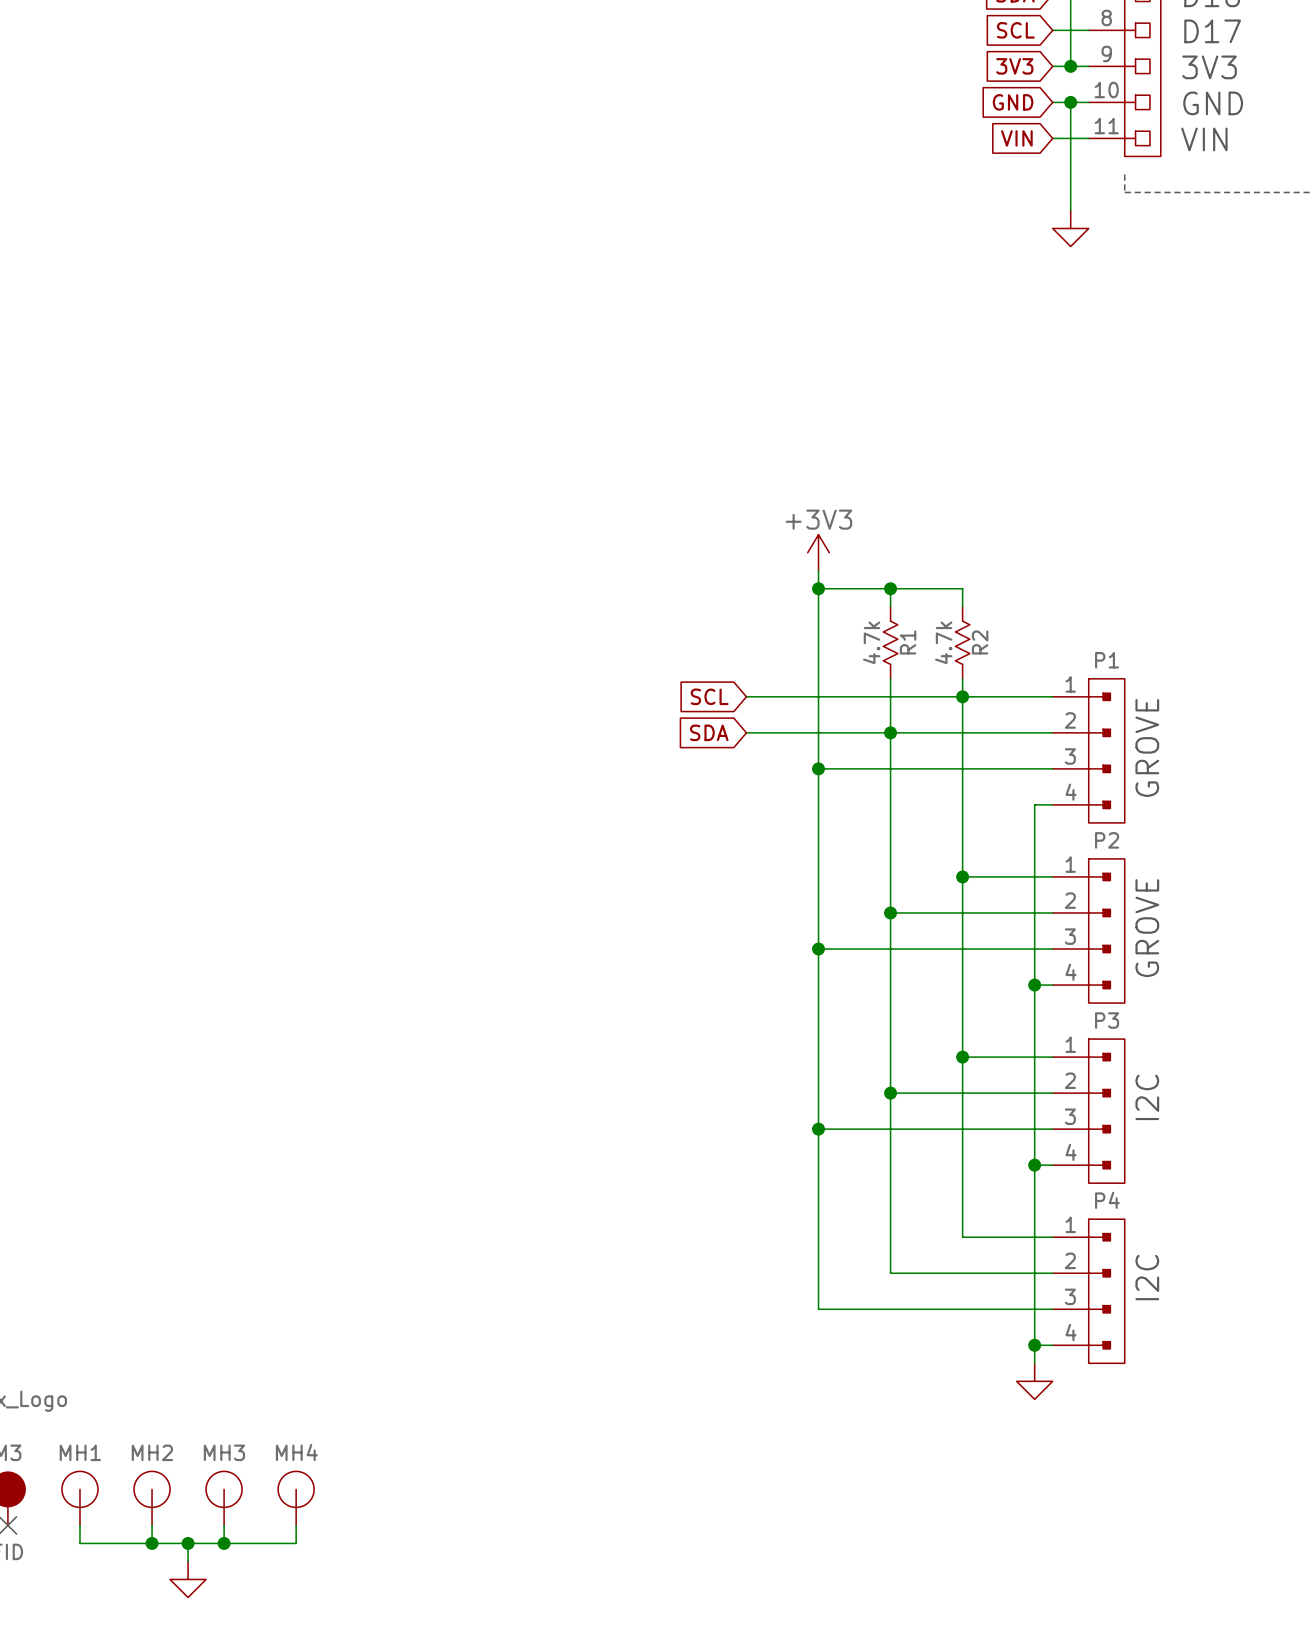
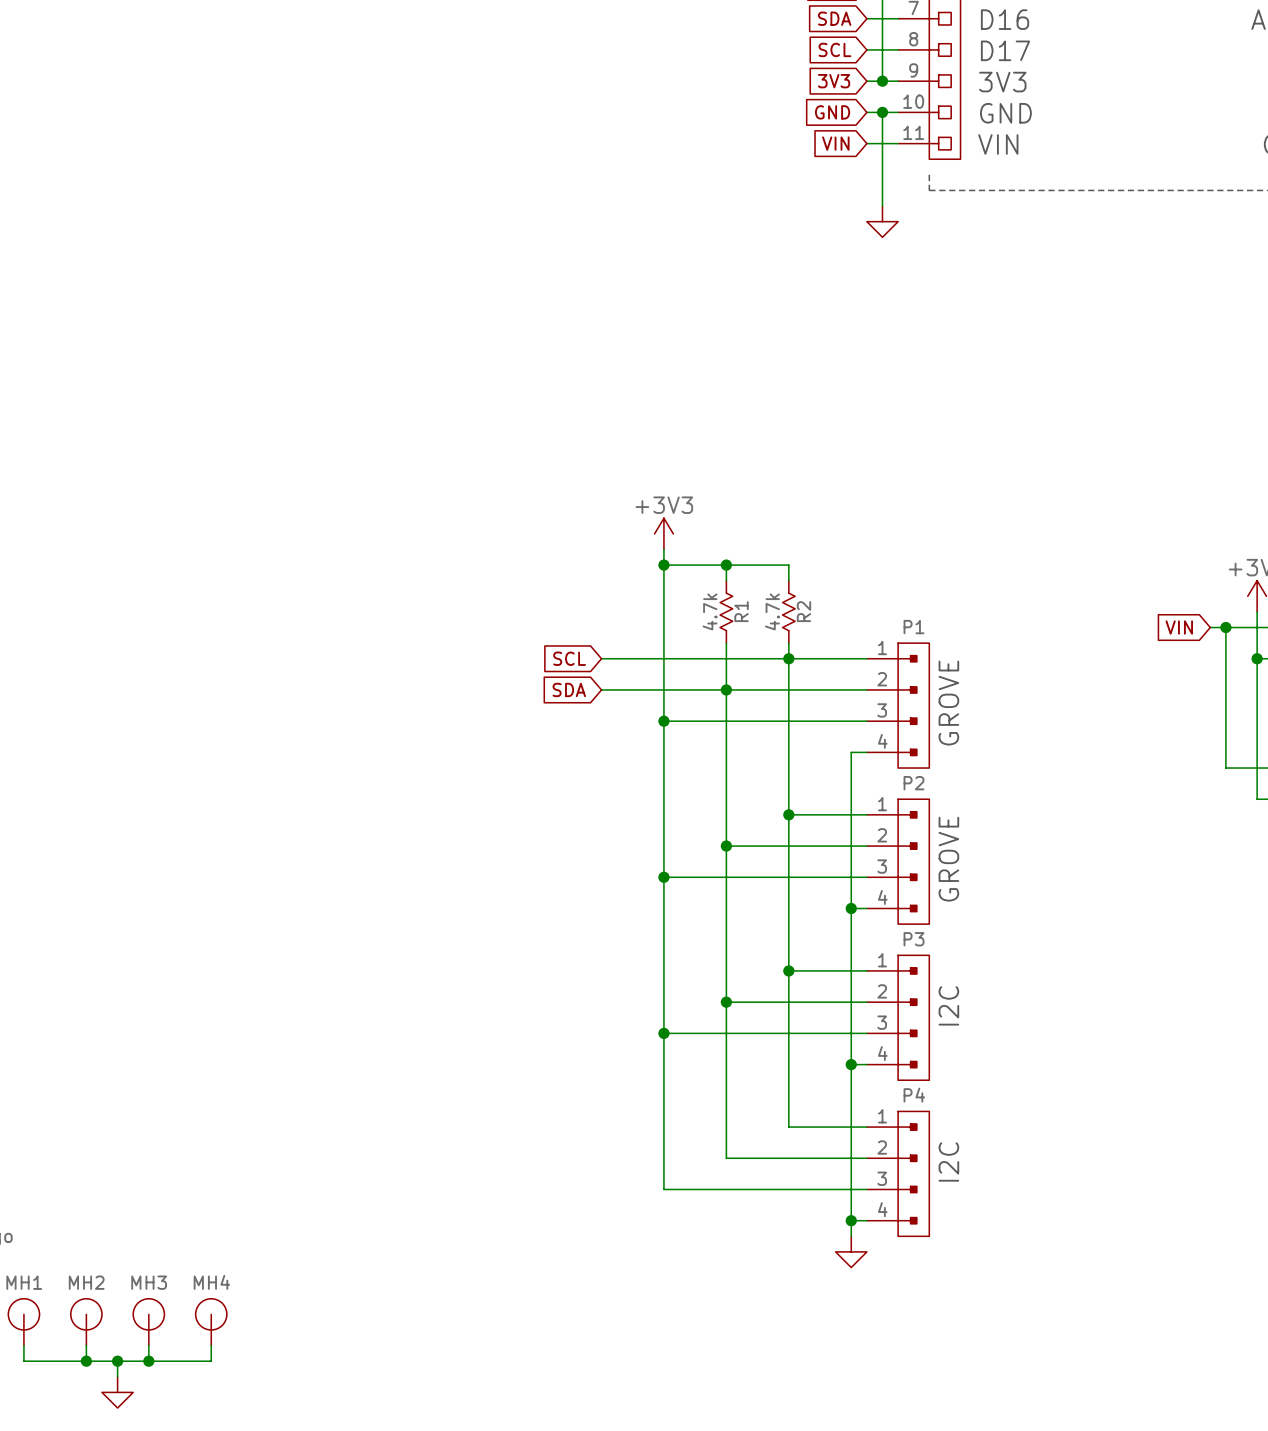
power symbol position: +3V3 (818, 552) -> +3V3 (663, 533)
wire: (818, 588) (962, 588) (962, 606) -> (663, 565) (788, 565) (788, 580)
junction position: (818, 588) -> (663, 565)
wire: (890, 588) (890, 606) -> (726, 565) (726, 580)
junction position: (890, 588) -> (726, 565)
R1 position: (890, 642) -> (726, 611)
R2 position: (962, 642) -> (788, 611)
global label: SCL (709, 696) -> none
wire: (746, 696) (1052, 696) -> none
junction: (962, 696) -> none
global label: SDA (709, 732) -> SCL (569, 658)
junction: (890, 732) -> none
junction: none -> (788, 658)
text position: GROVE (1147, 747) -> GROVE (948, 703)
P1 position: (1088, 750) -> (898, 705)
global label: none -> SDA (569, 689)
junction: (818, 768) -> none
junction: none -> (726, 689)
wire: none -> (663, 721) (851, 721)
junction: none -> (663, 721)
wire: (1034, 804) (1034, 840) -> (866, 752) (851, 752)
wire: (962, 876) (1052, 876) -> none
junction: (962, 876) -> none
wire: (890, 912) (962, 912) -> none
junction: (890, 912) -> none
junction: none -> (788, 814)
text position: GROVE (1147, 928) -> GROVE (948, 859)
P2 position: (1088, 931) -> (898, 861)
wire: (818, 949) (890, 949) -> (601, 689) (663, 689)
junction: (818, 949) -> none
junction: none -> (726, 846)
wire: none -> (663, 877) (851, 877)
junction: none -> (663, 877)
junction position: (1034, 985) -> (851, 908)
wire: none -> (851, 908) (866, 908)
wire: (962, 1057) (1052, 1057) -> none
junction: (962, 1057) -> none
wire: (890, 1093) (962, 1093) -> none
junction: (890, 1093) -> none
junction: none -> (788, 970)
text position: I2C (1147, 1097) -> I2C (948, 1005)
P3 position: (1088, 1111) -> (898, 1017)
wire: (818, 1129) (890, 1129) -> none
junction: (818, 1129) -> none
junction: none -> (726, 1002)
wire: none -> (663, 1033) (851, 1033)
junction: none -> (663, 1033)
junction position: (1034, 1165) -> (851, 1064)
wire: none -> (851, 1064) (866, 1064)
wire: (962, 1237) (1052, 1237) -> none
wire: (890, 1273) (962, 1273) -> (788, 1095) (788, 1127)
text position: I2C (1147, 1277) -> I2C (948, 1161)
P4 position: (1088, 1291) -> (898, 1173)
wire: (818, 1309) (890, 1309) -> (726, 1127) (726, 1158)
wire: none -> (663, 1158) (663, 1189) (851, 1189)
junction position: (1034, 1345) -> (851, 1220)
power symbol position: (1034, 1381) -> (851, 1251)

